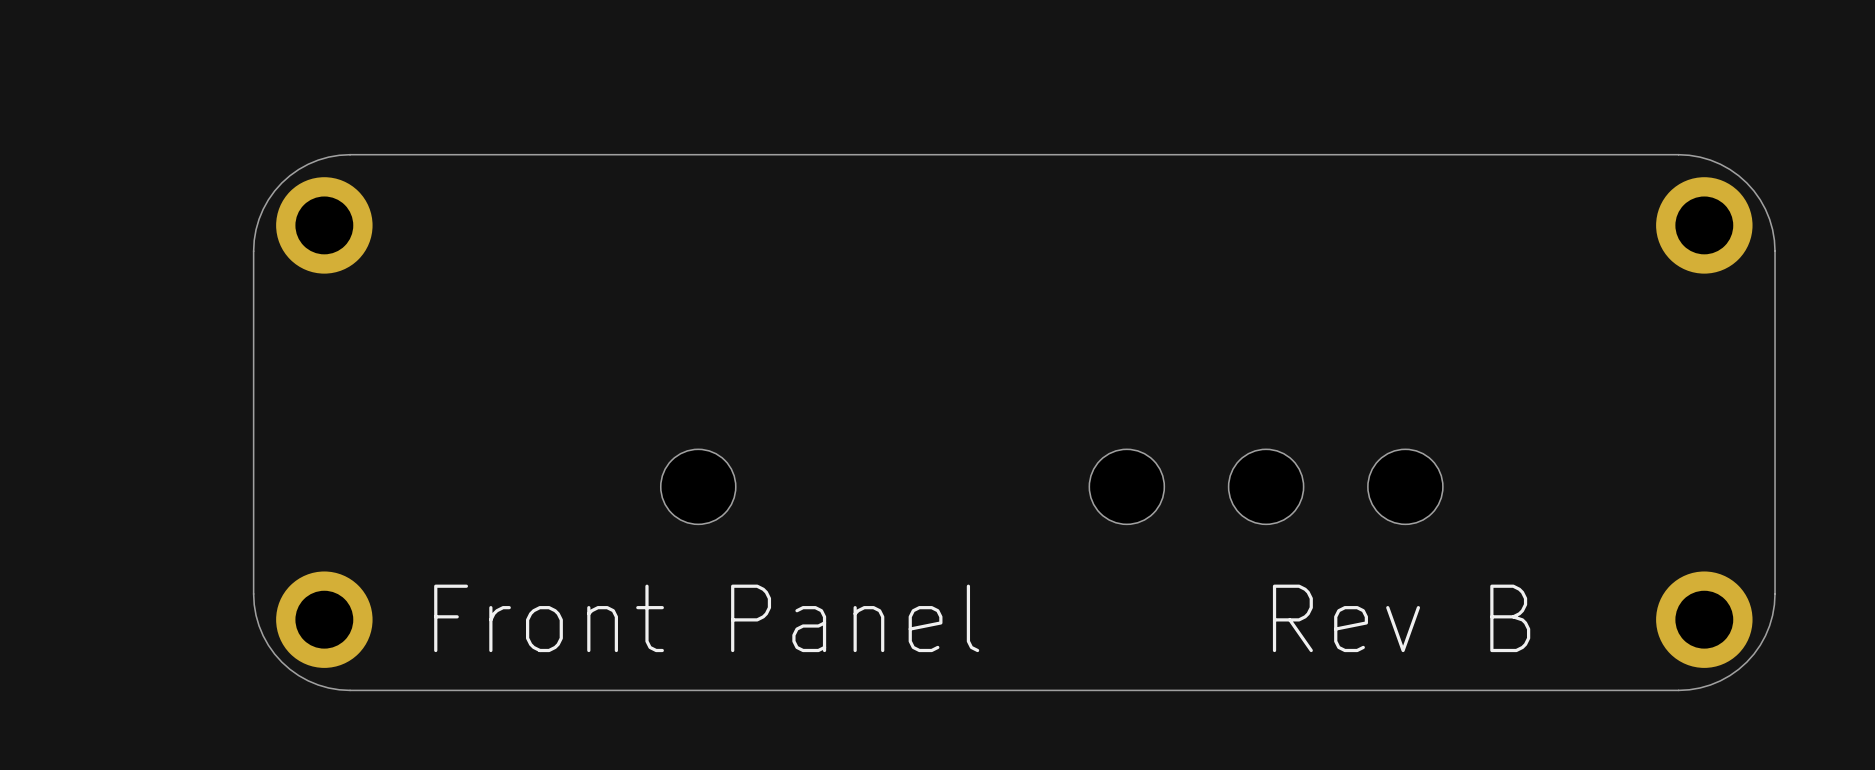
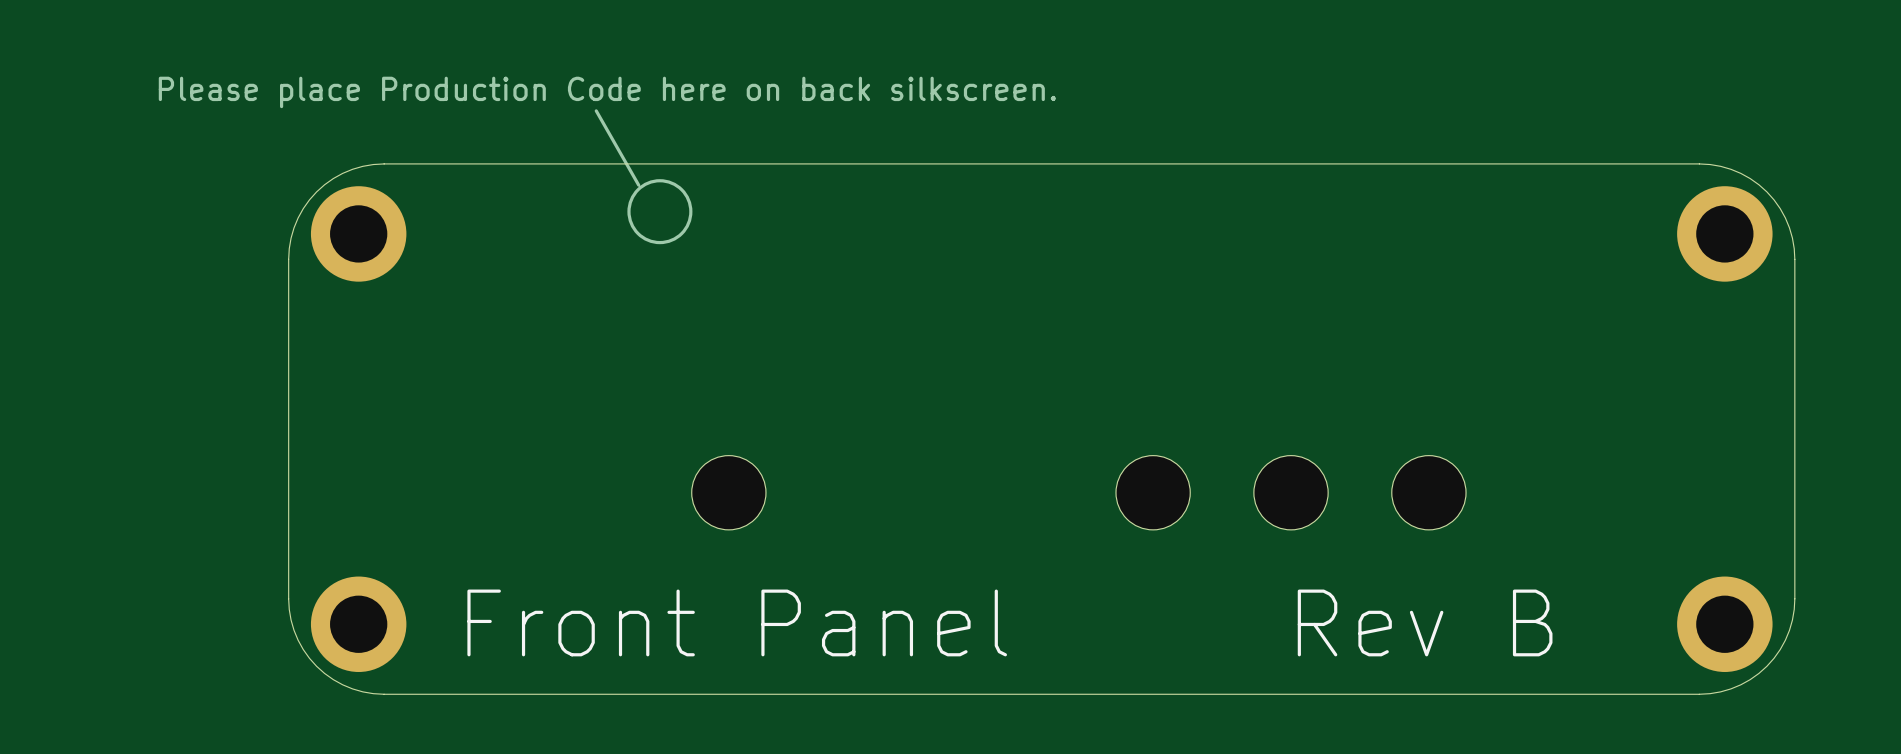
text: none -> Please place Production Code here on back silkscreen. (607, 92)
line: none -> (596, 110) (638, 185)
drawing: none -> [627, 179, 693, 245]

